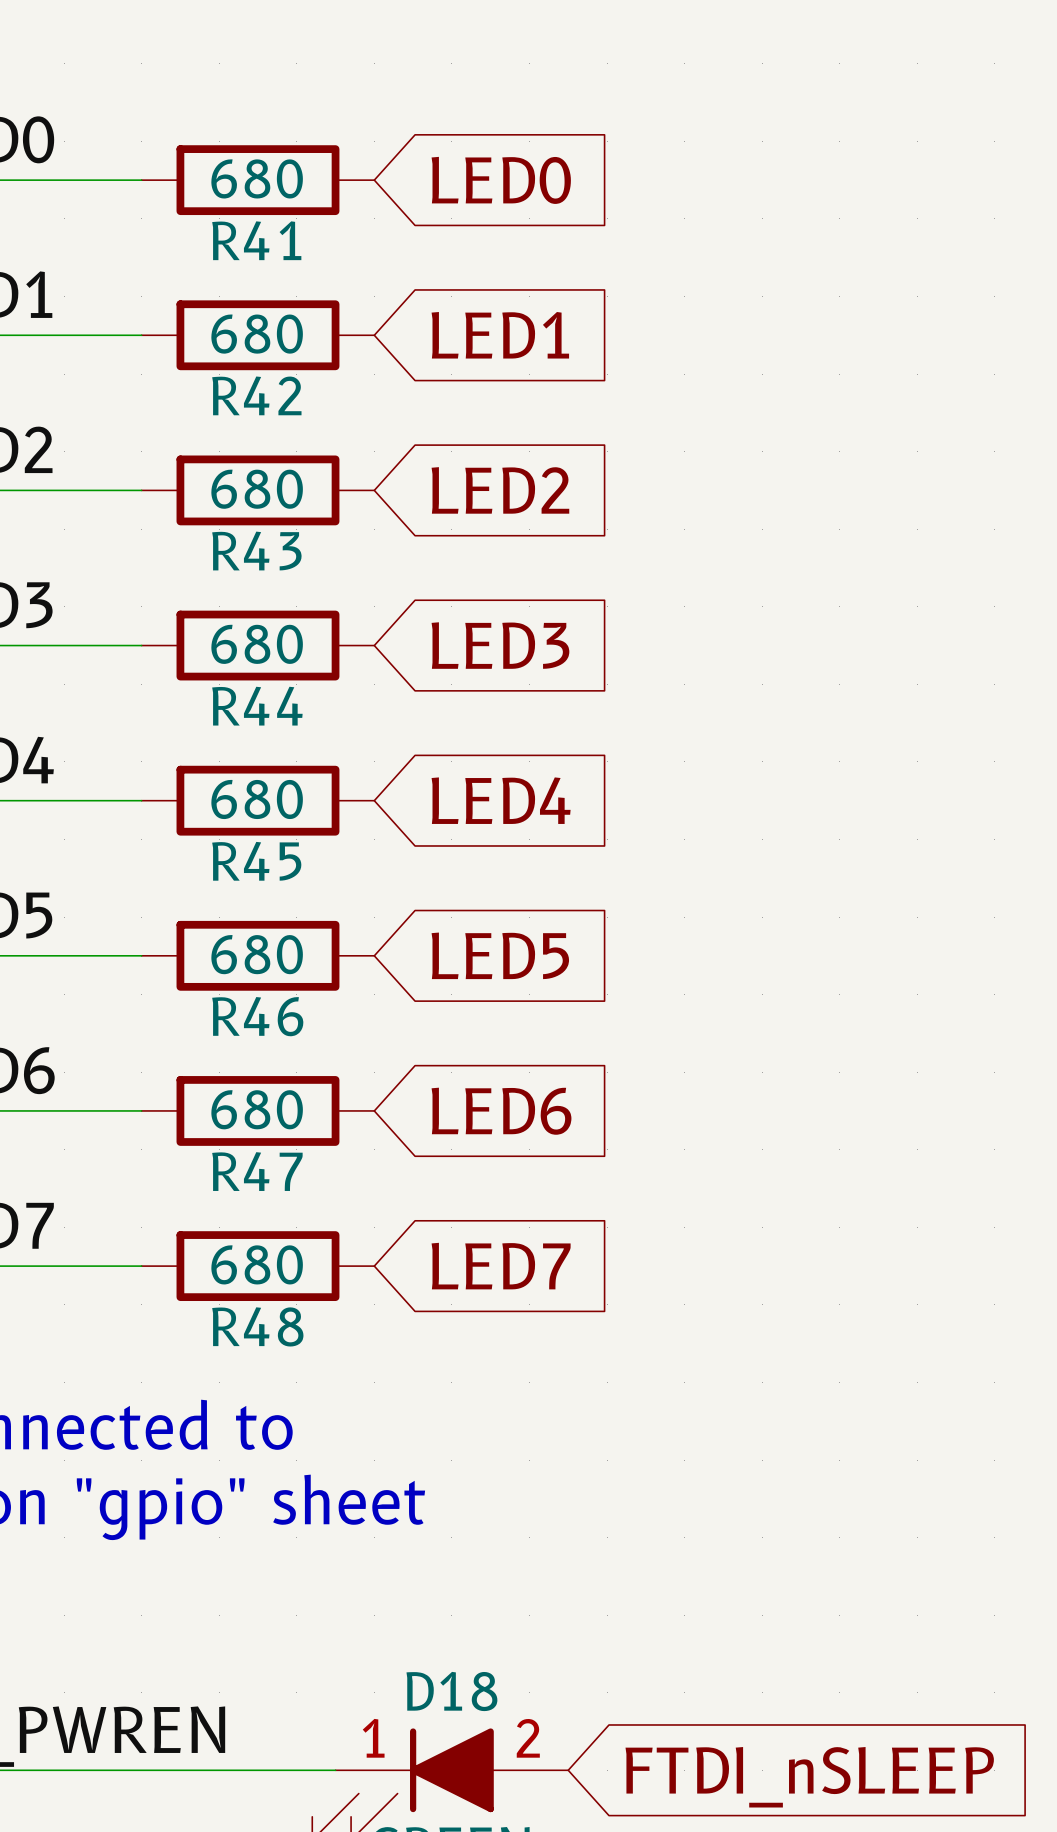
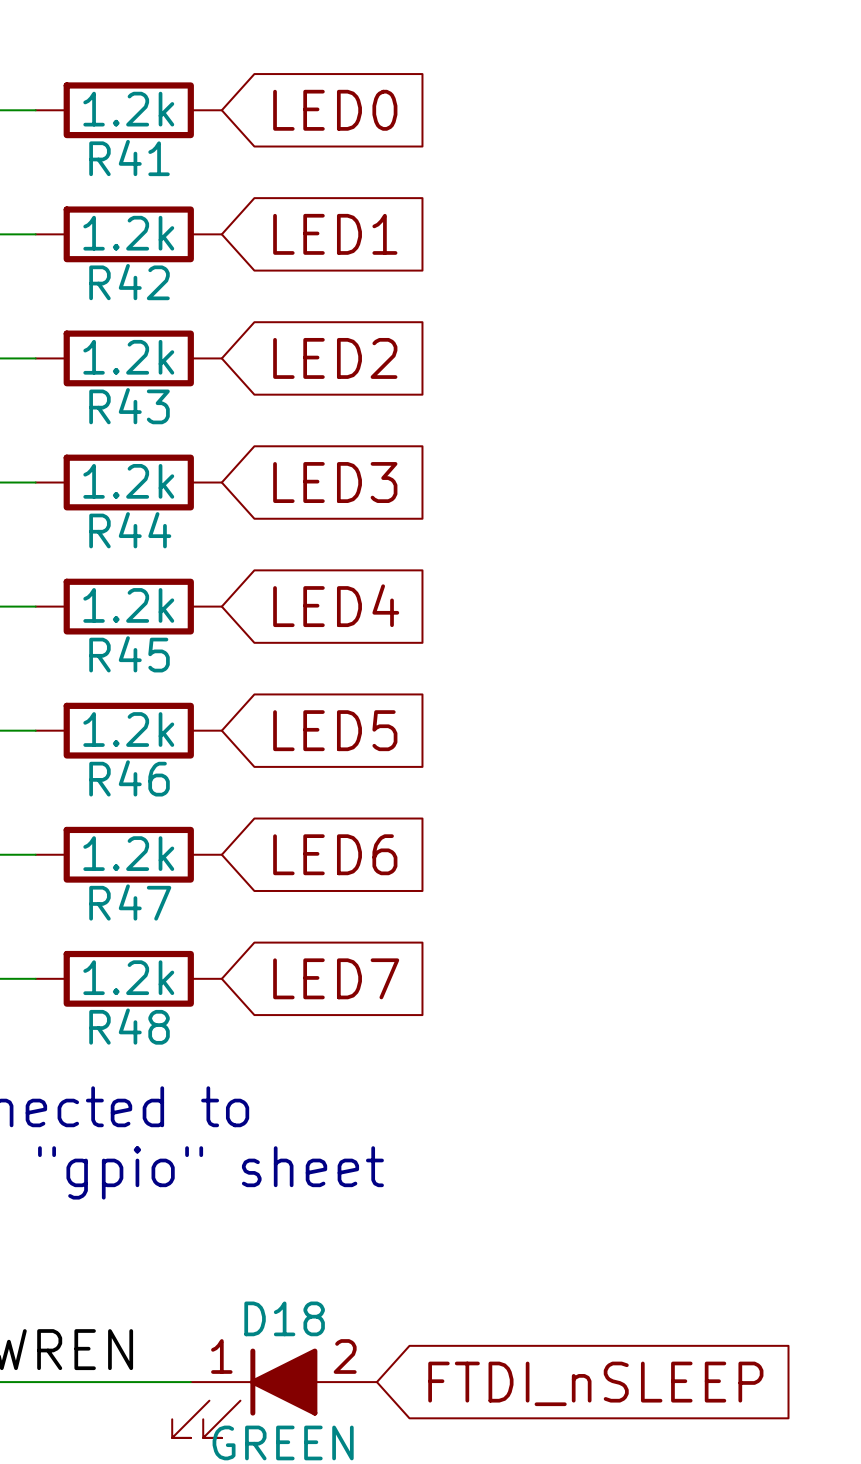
R41 value: 680 (257, 178) -> 1.2k (128, 109)
R42 value: 680 (257, 334) -> 1.2k (128, 233)
R43 value: 680 (257, 489) -> 1.2k (128, 357)
R44 value: 680 (257, 644) -> 1.2k (128, 481)
R45 value: 680 (257, 799) -> 1.2k (128, 605)
R46 value: 680 (257, 954) -> 1.2k (128, 729)
R47 value: 680 (257, 1109) -> 1.2k (128, 853)
R48 value: 680 (257, 1264) -> 1.2k (128, 977)

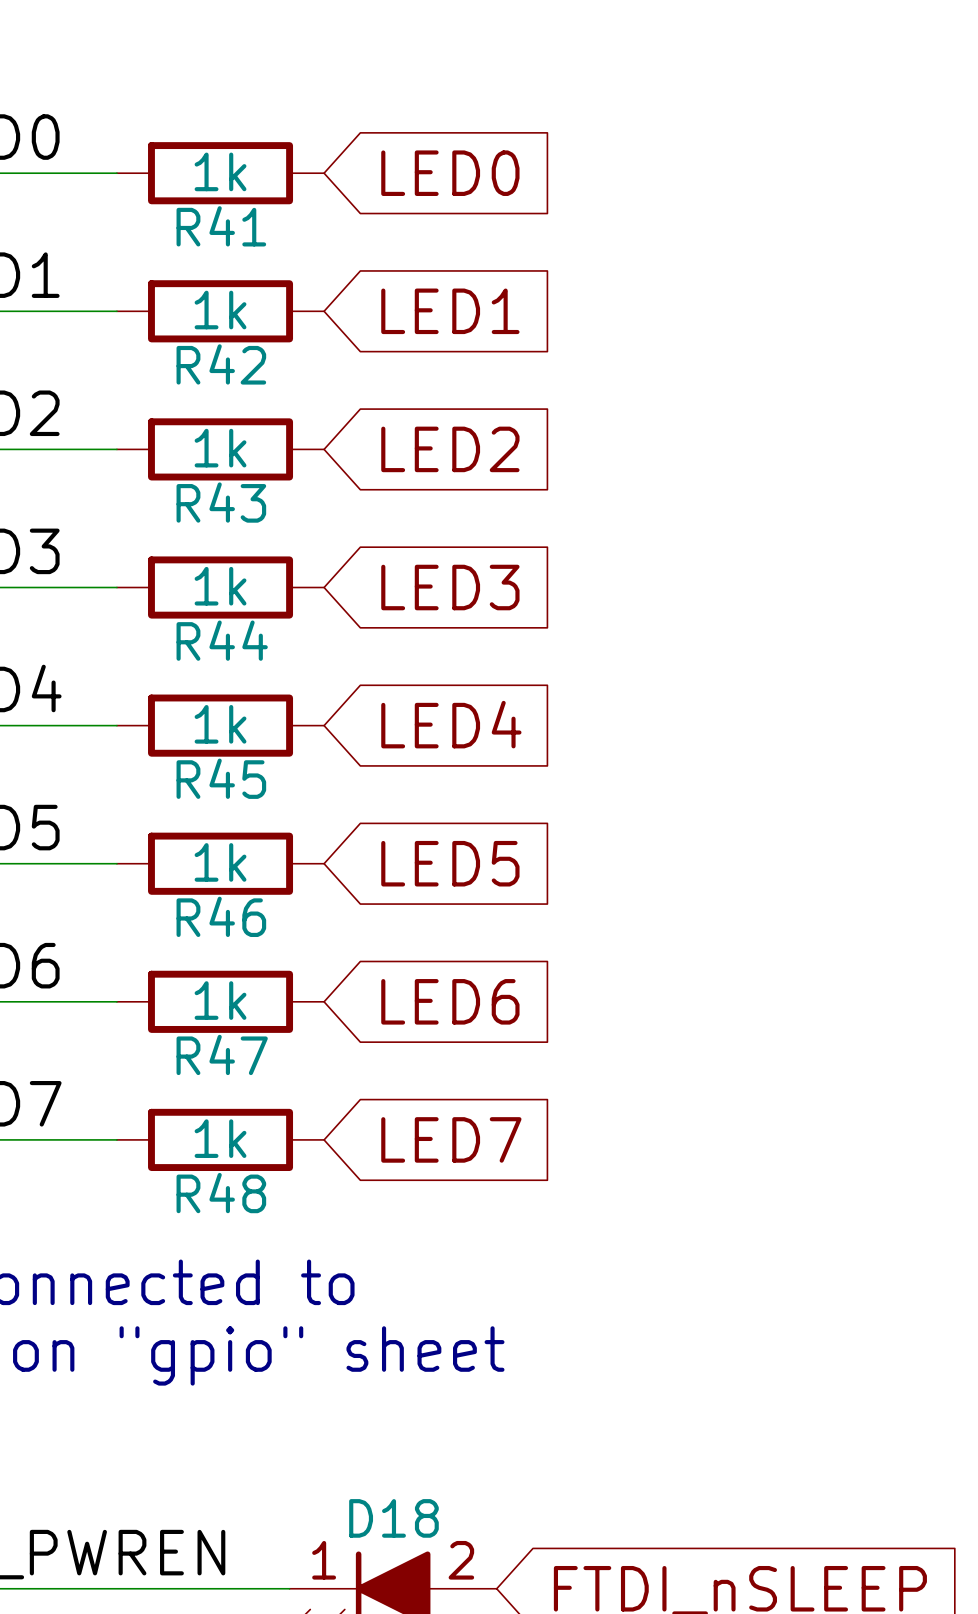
R41 value: 1.2k (128, 109) -> 1k (220, 171)
R42 value: 1.2k (128, 233) -> 1k (220, 310)
R43 value: 1.2k (128, 357) -> 1k (220, 448)
R44 value: 1.2k (128, 481) -> 1k (220, 586)
R45 value: 1.2k (128, 605) -> 1k (220, 724)
R46 value: 1.2k (128, 729) -> 1k (220, 862)
R47 value: 1.2k (128, 853) -> 1k (220, 1000)
R48 value: 1.2k (128, 977) -> 1k (220, 1138)

